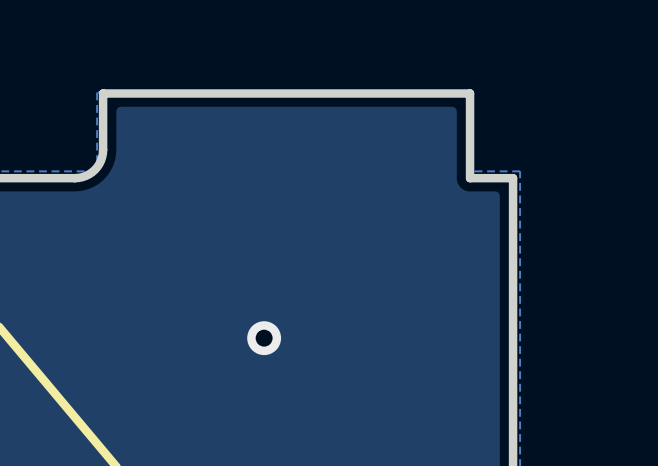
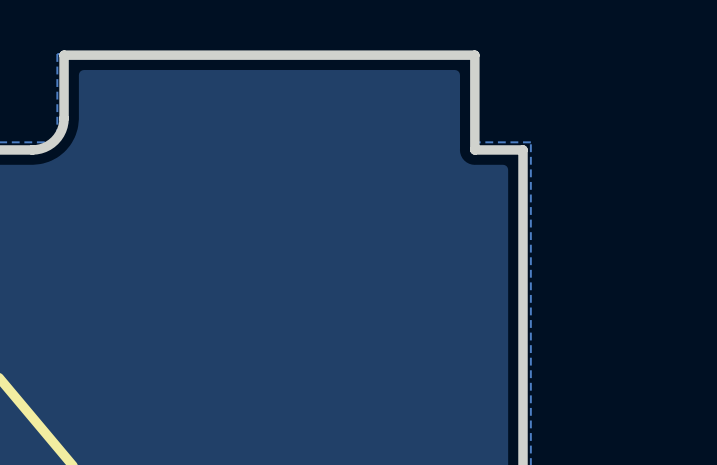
via: (264, 338) -> none

